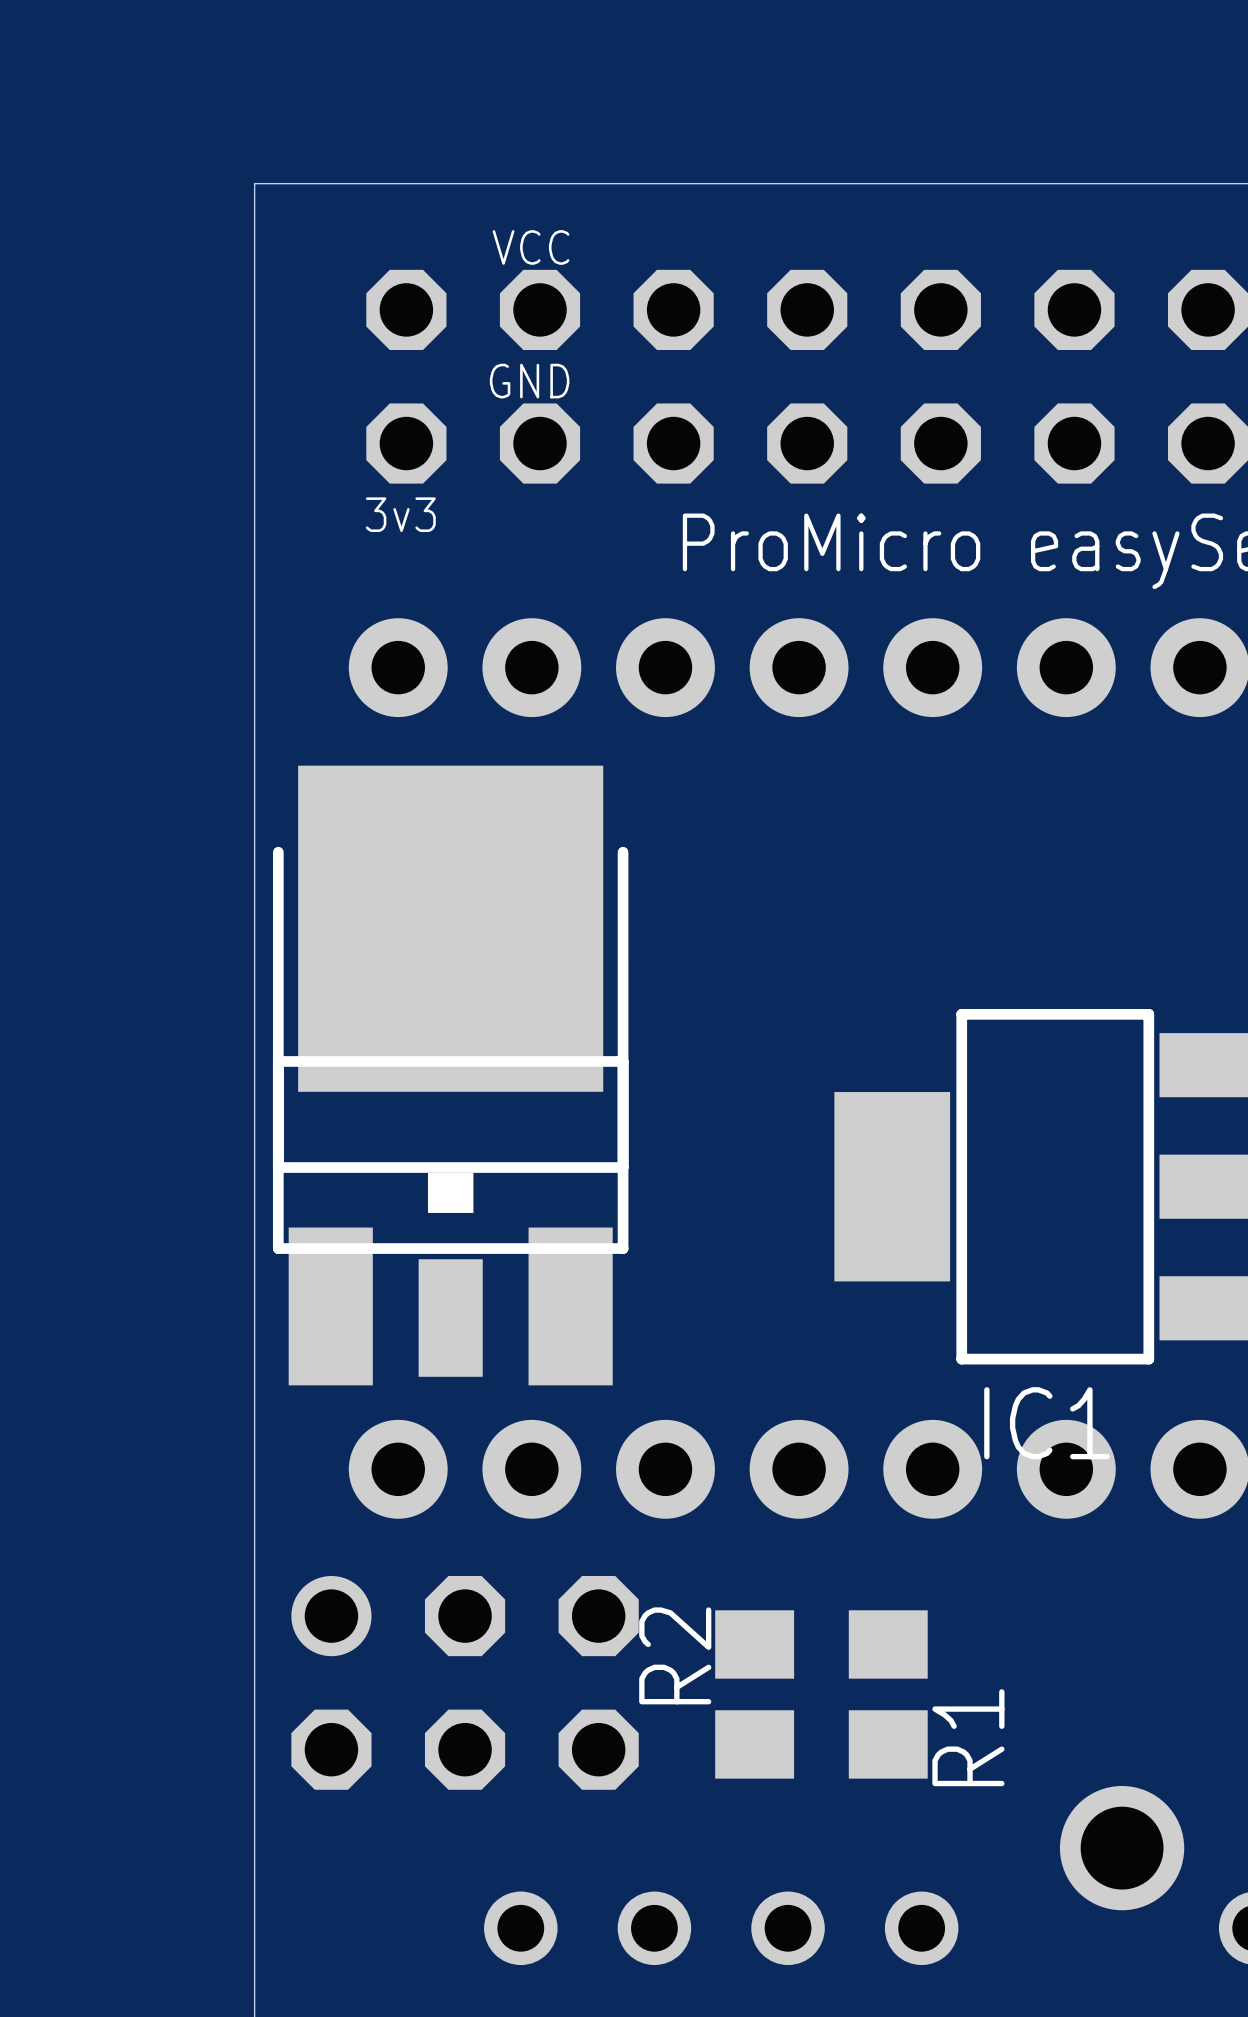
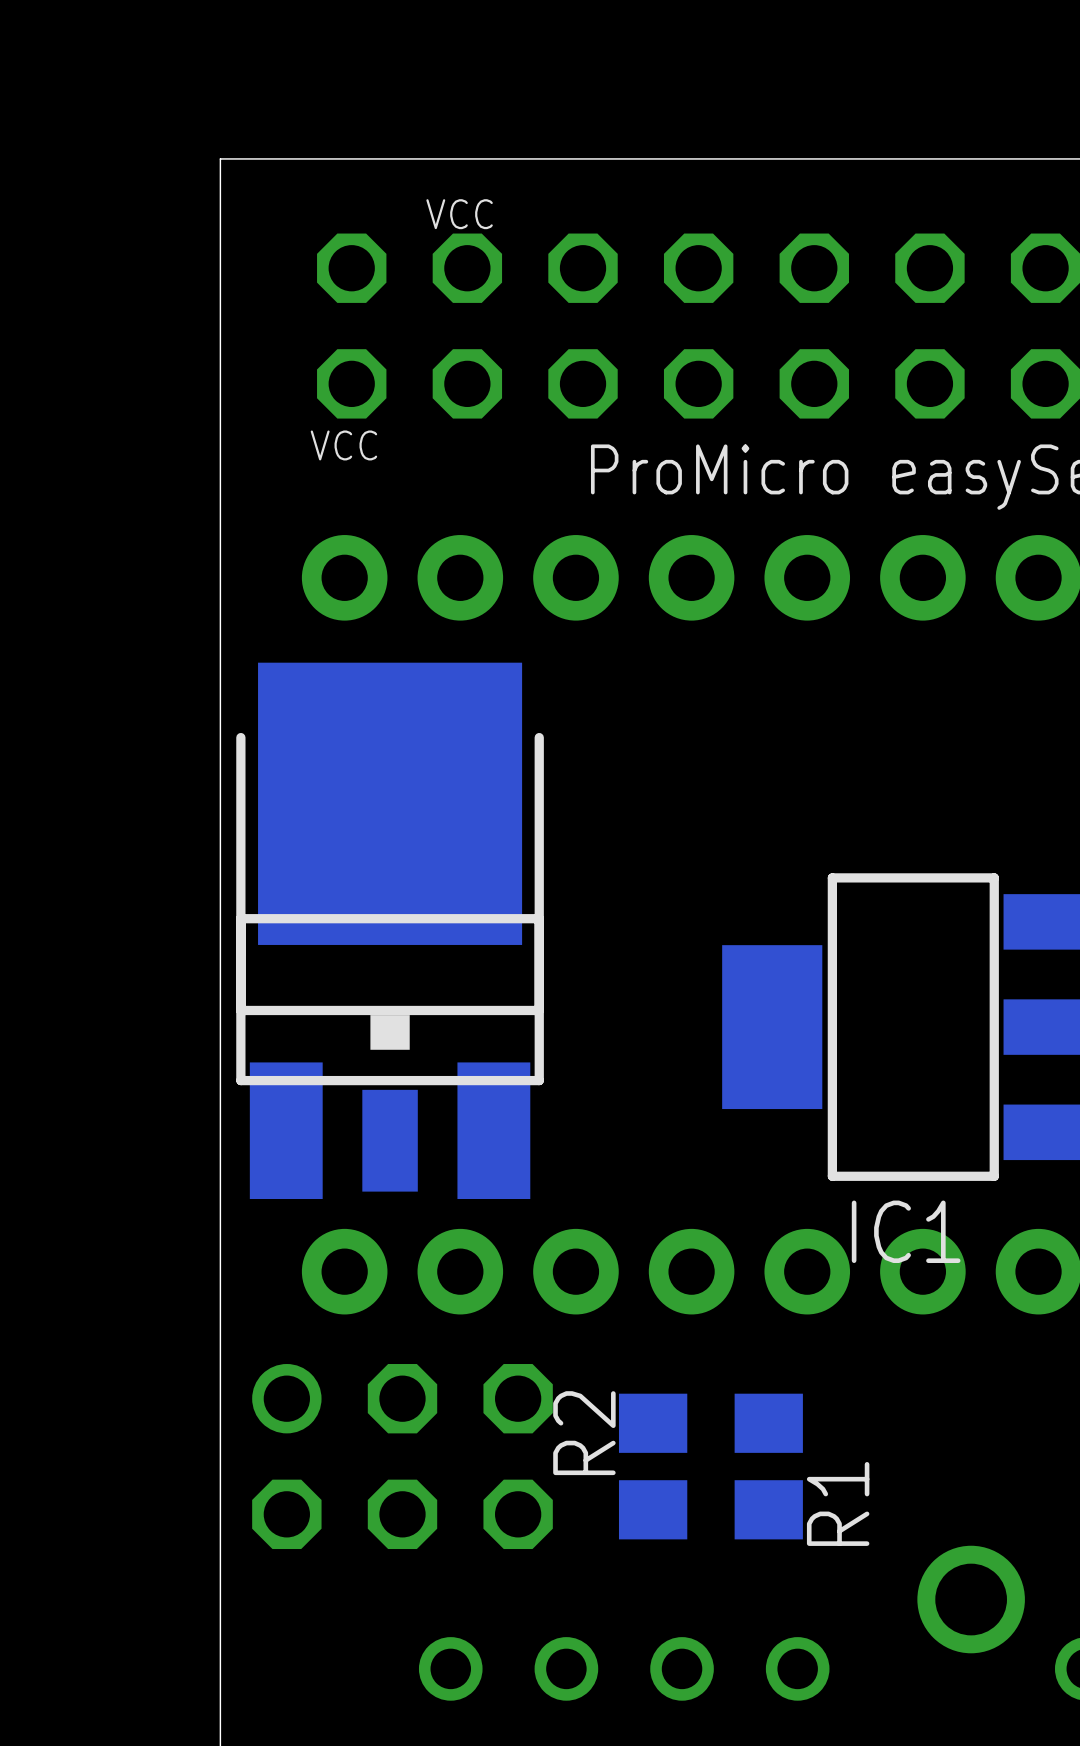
text: GND (529, 381) -> none
text: 3v3 (400, 514) -> VCC (343, 445)

